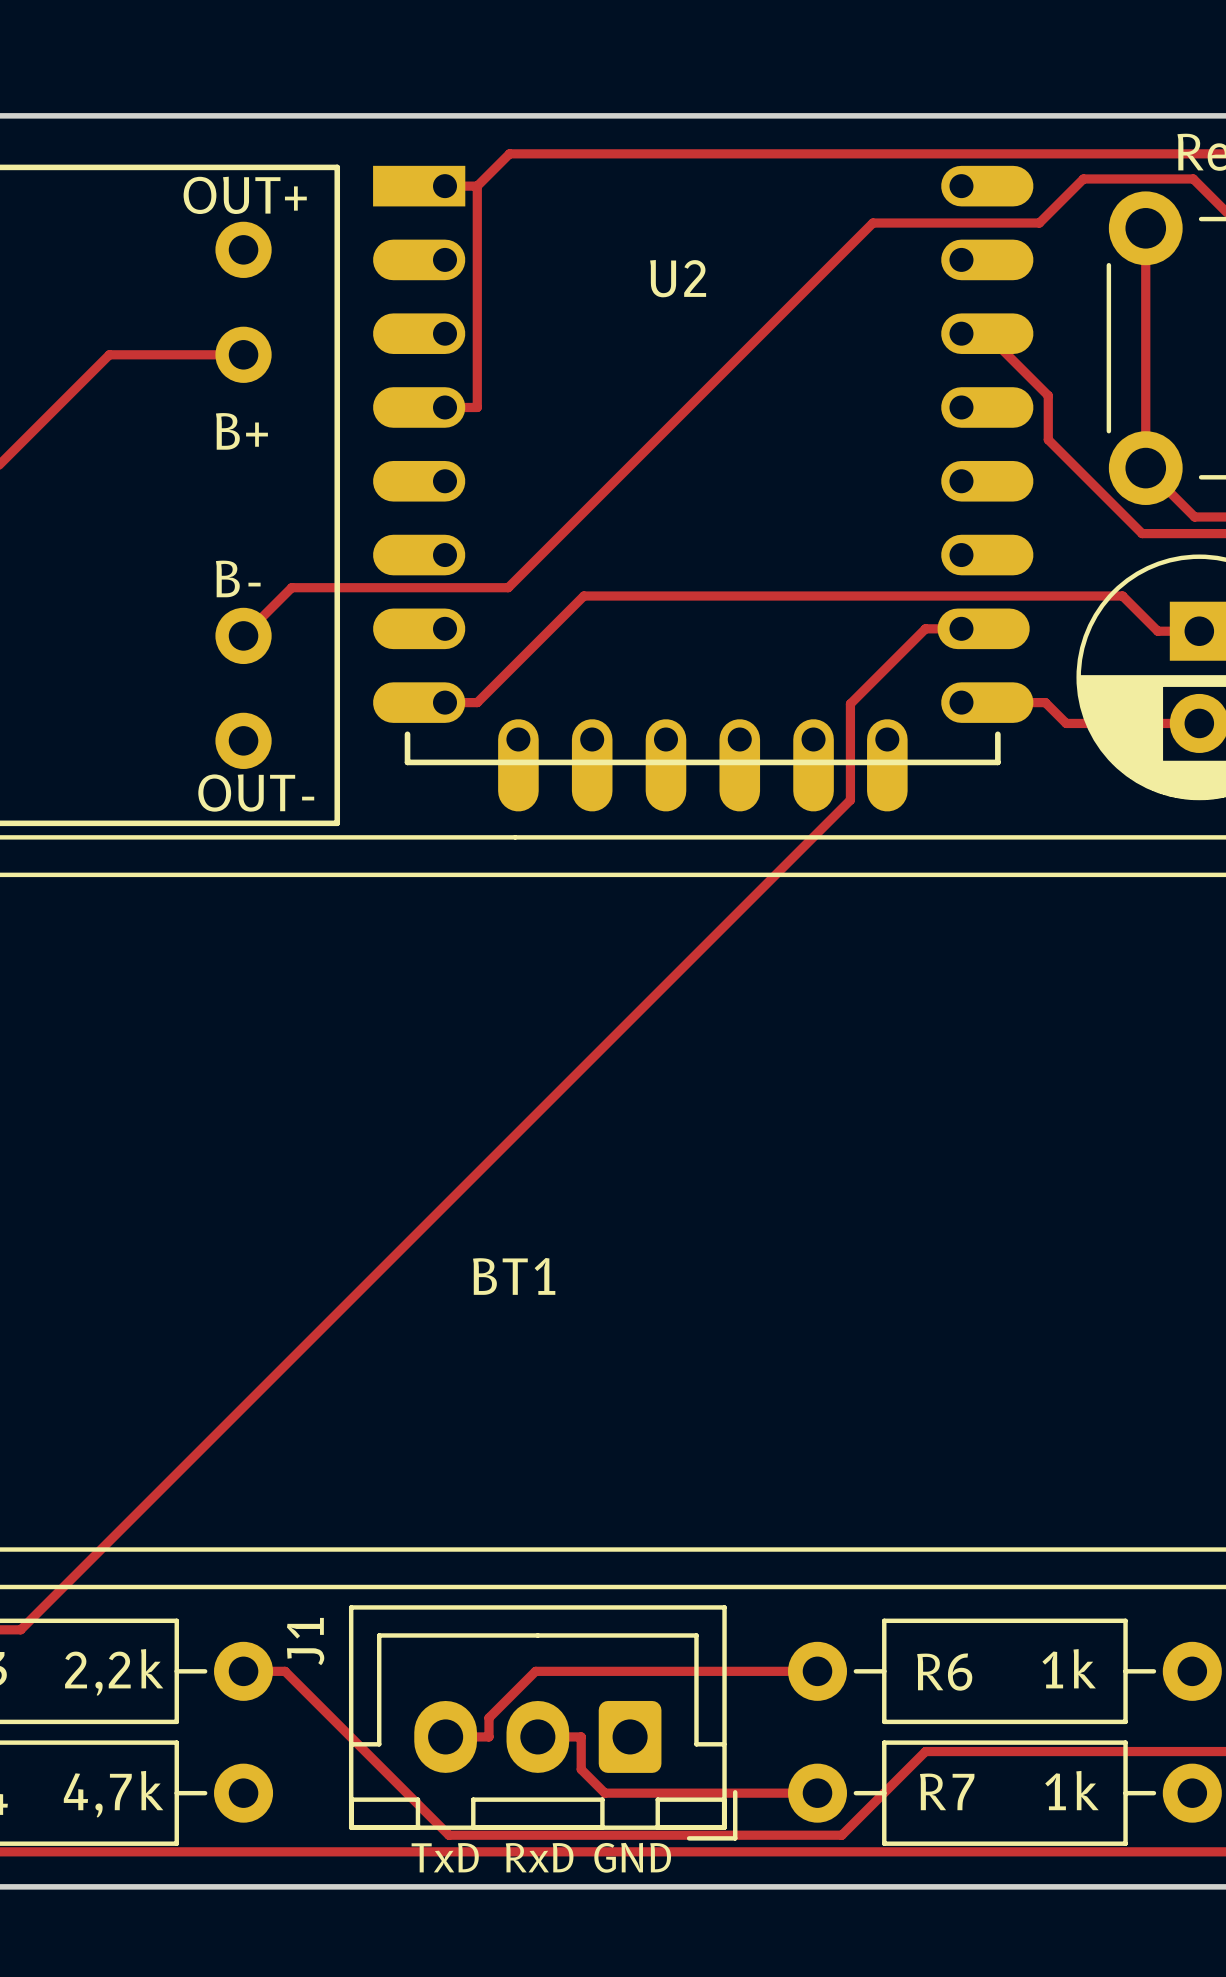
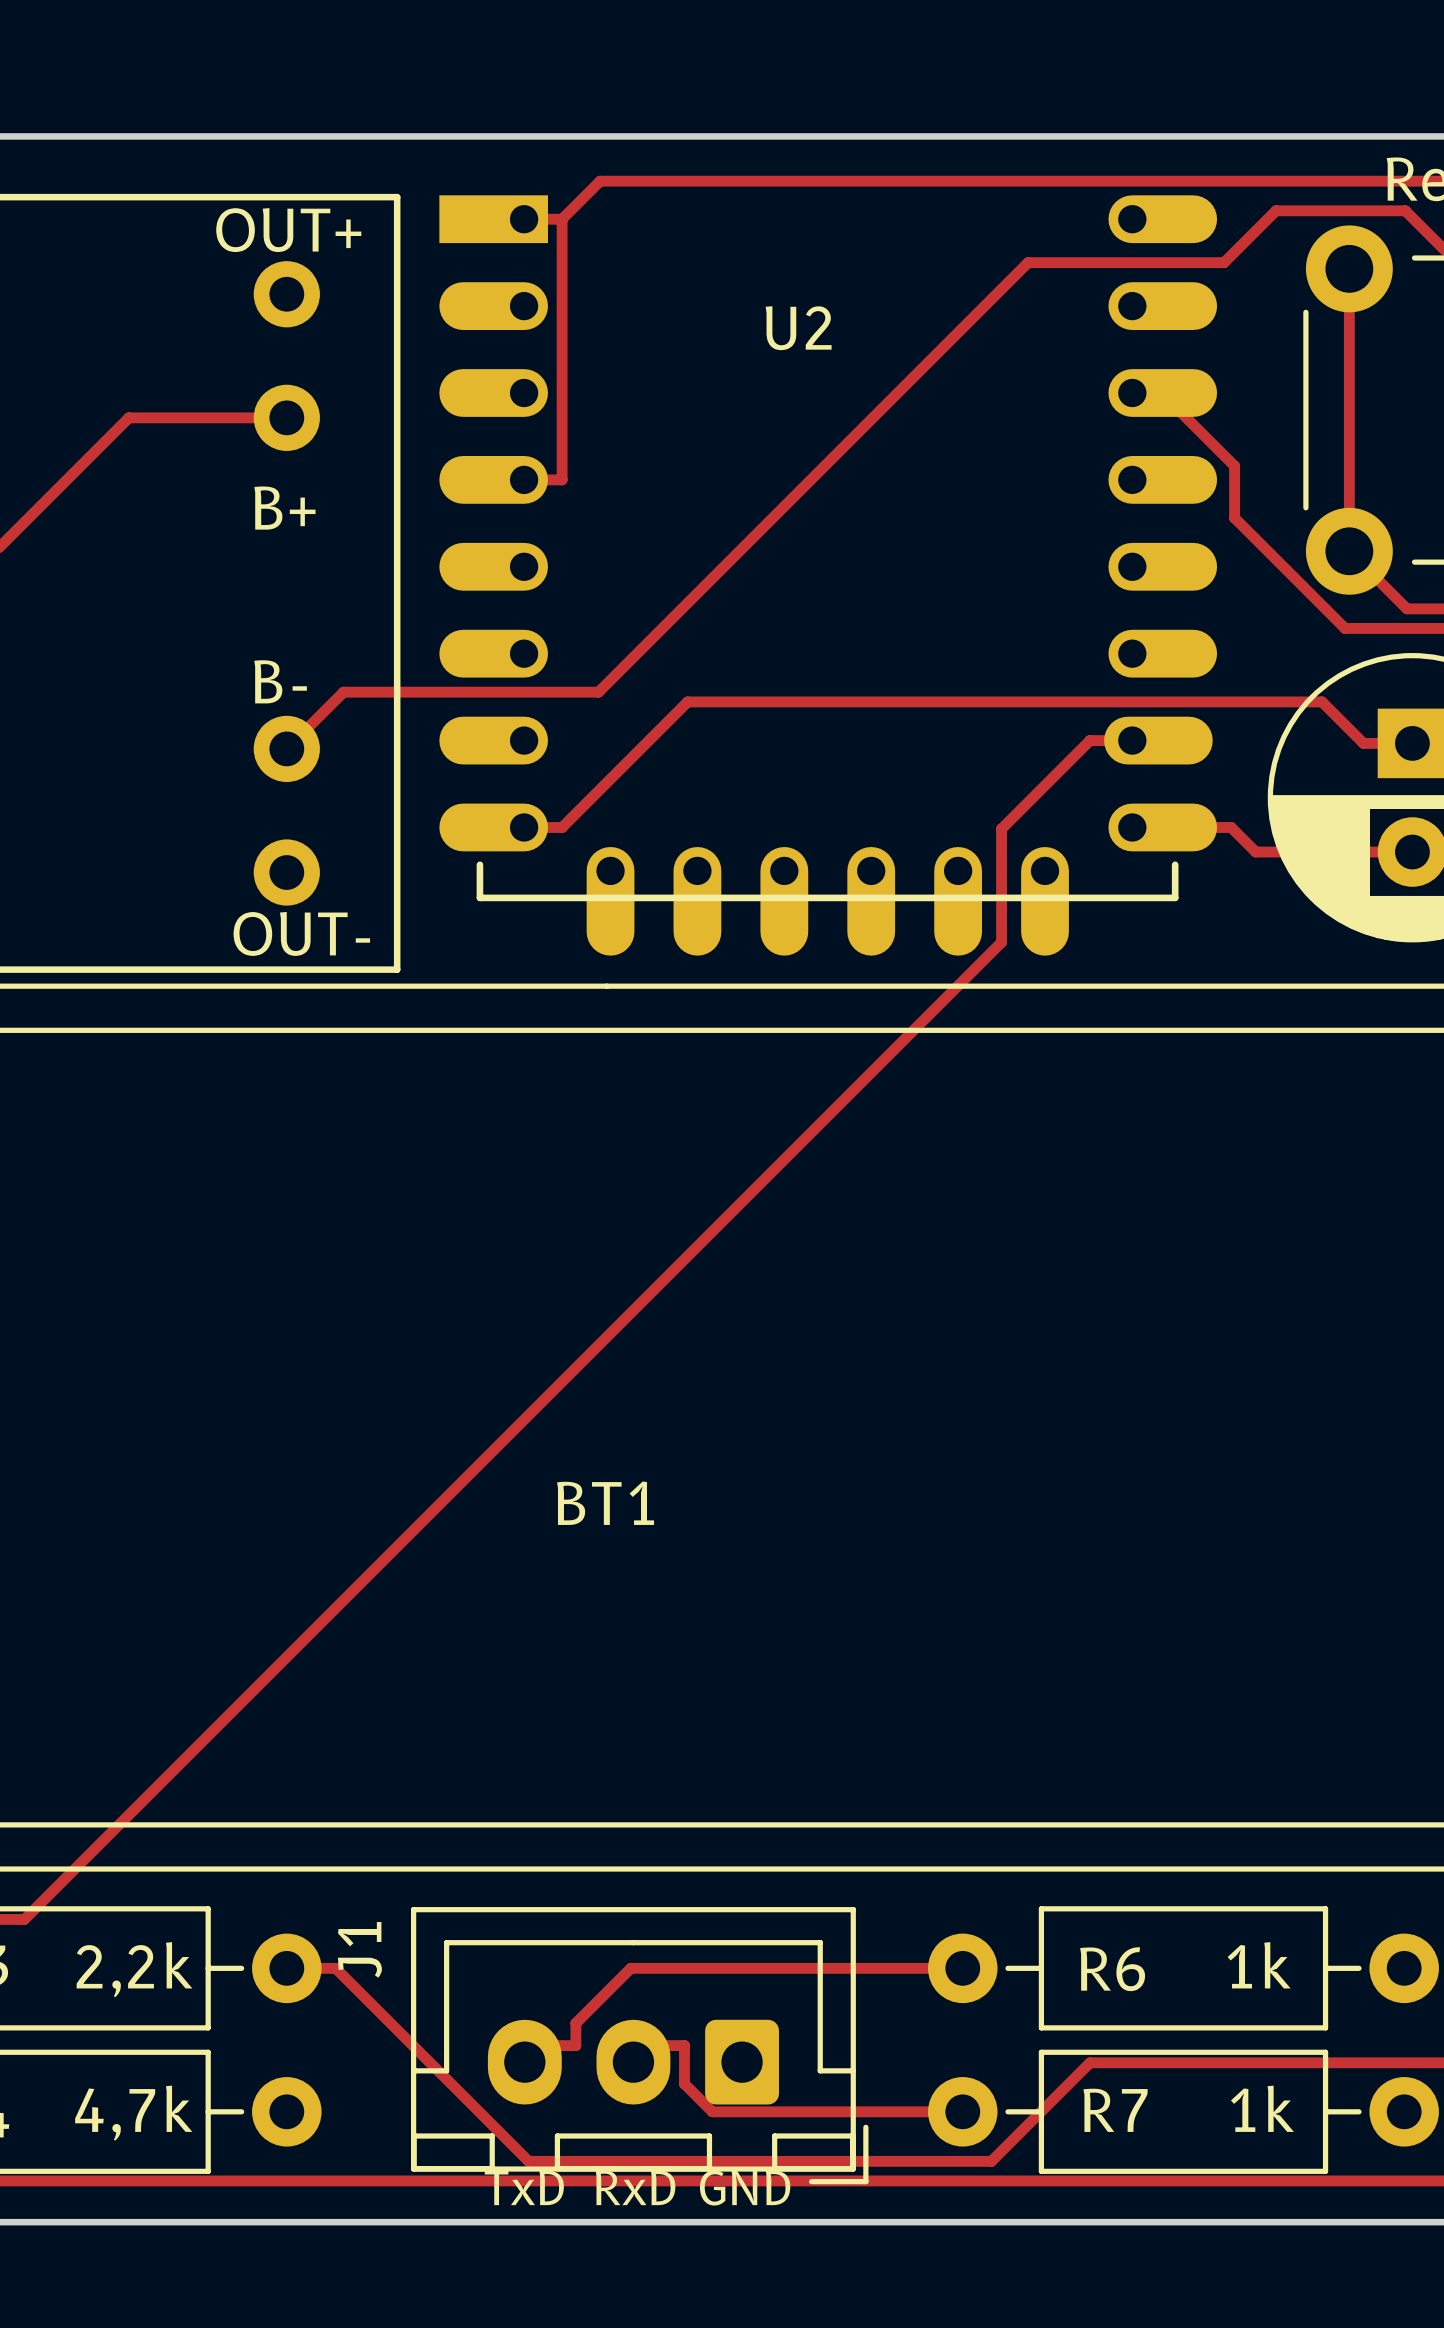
J1 position: (543, 1722) -> (639, 2045)

